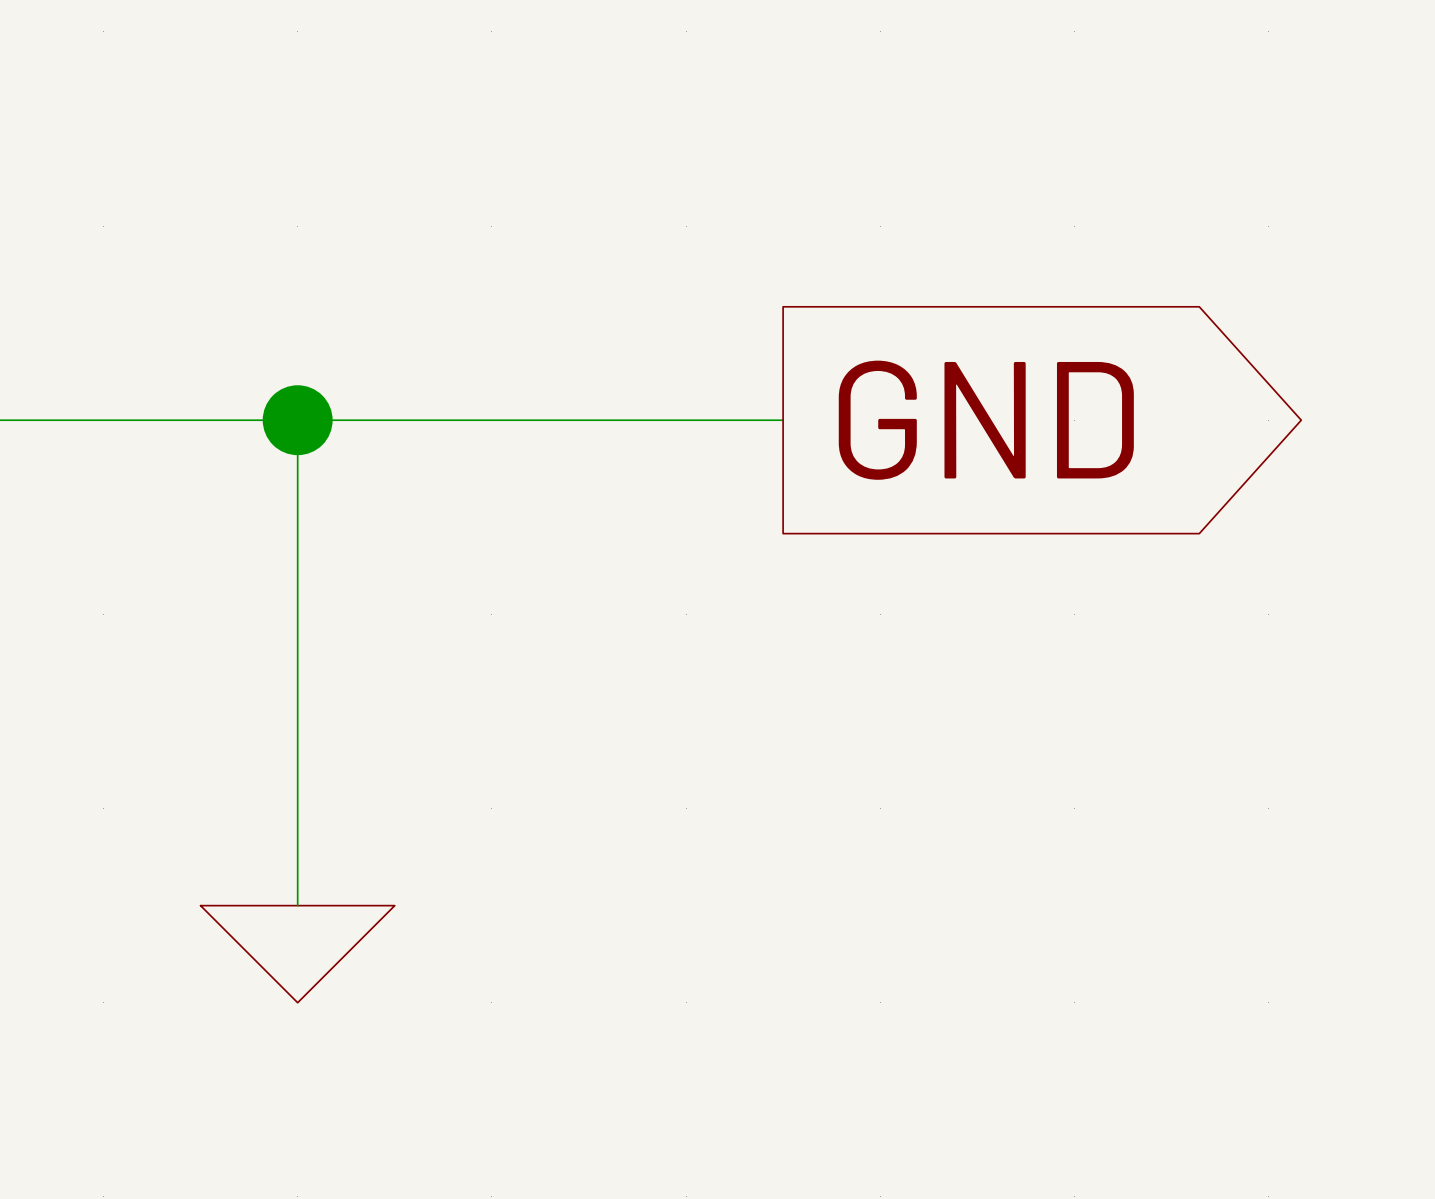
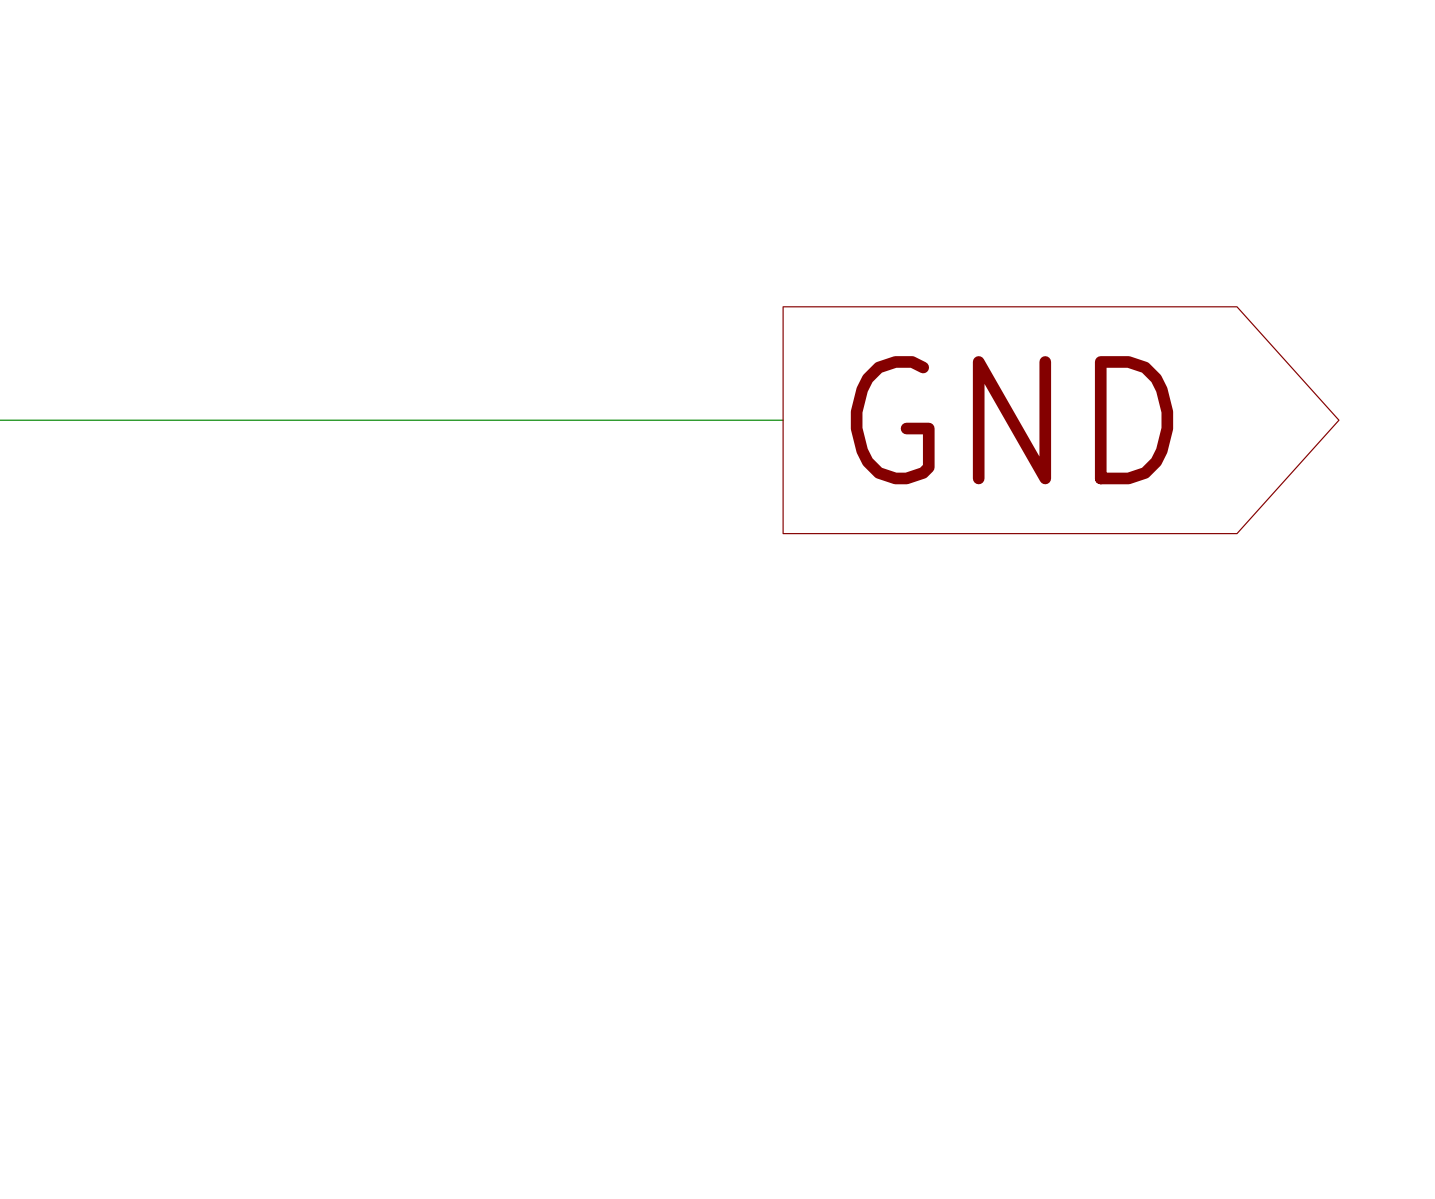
wire: (297, 420) (297, 905) -> none
junction: (297, 420) -> none
power symbol: (297, 954) -> none

